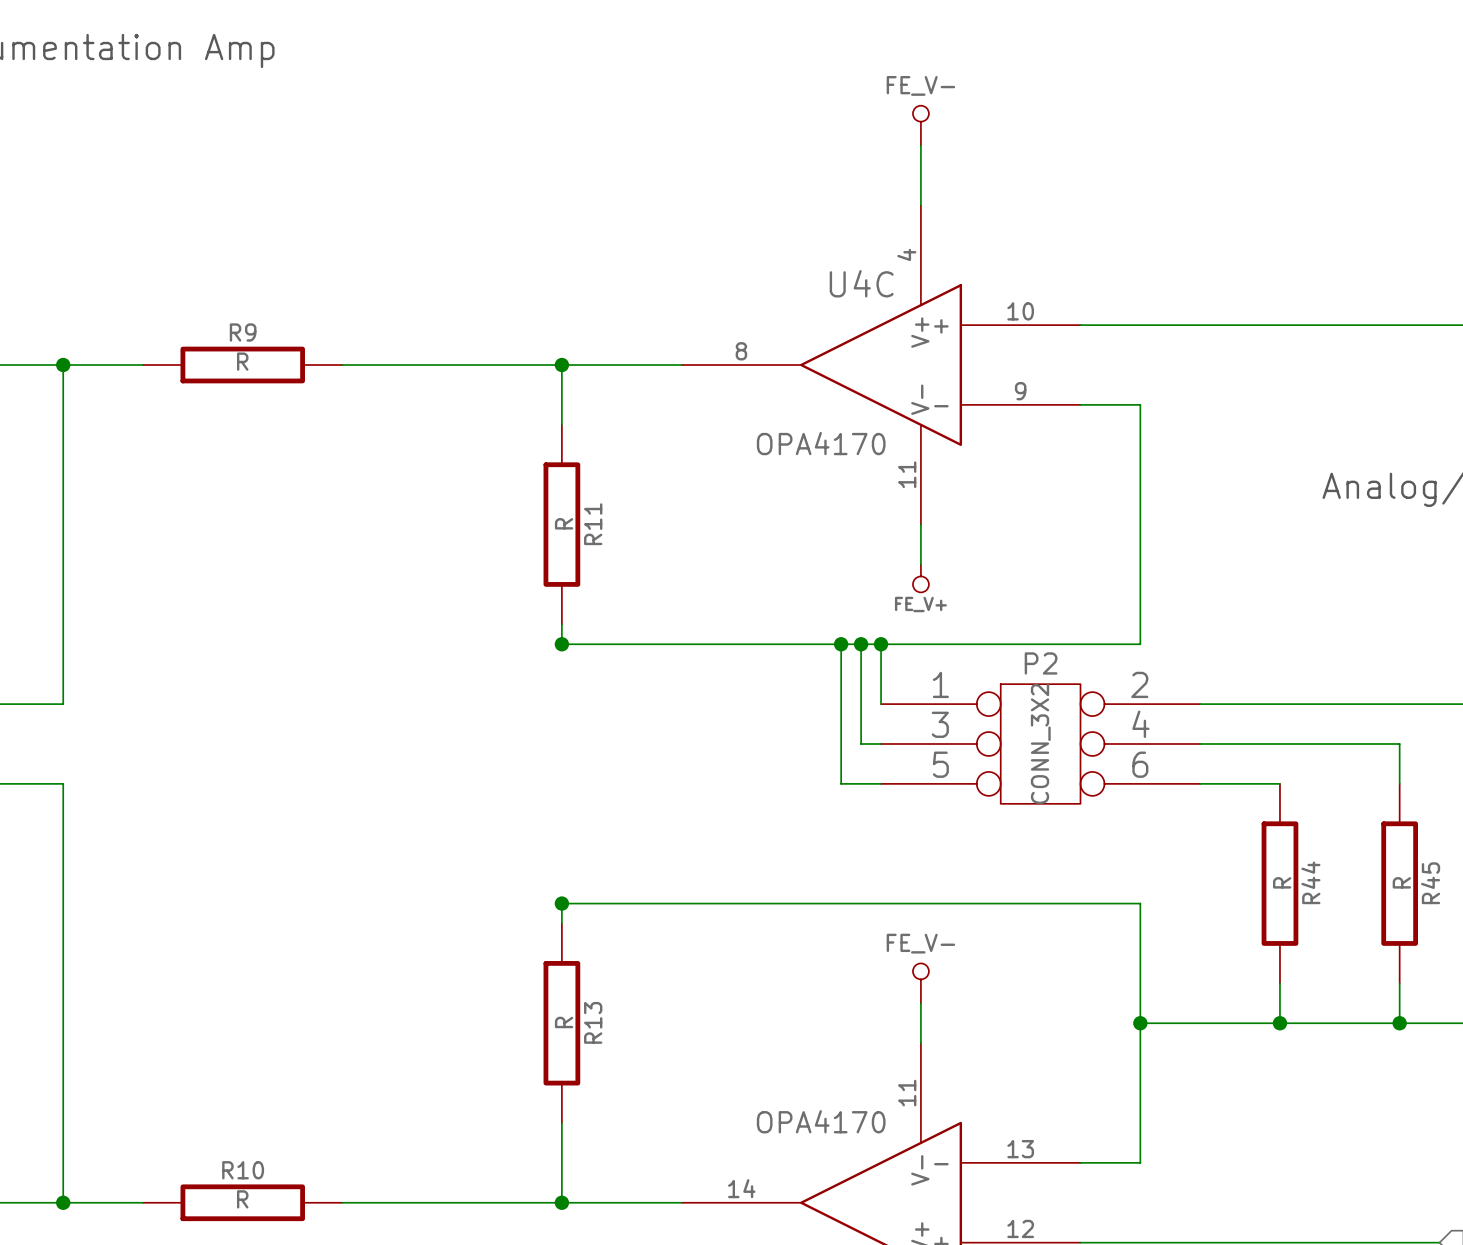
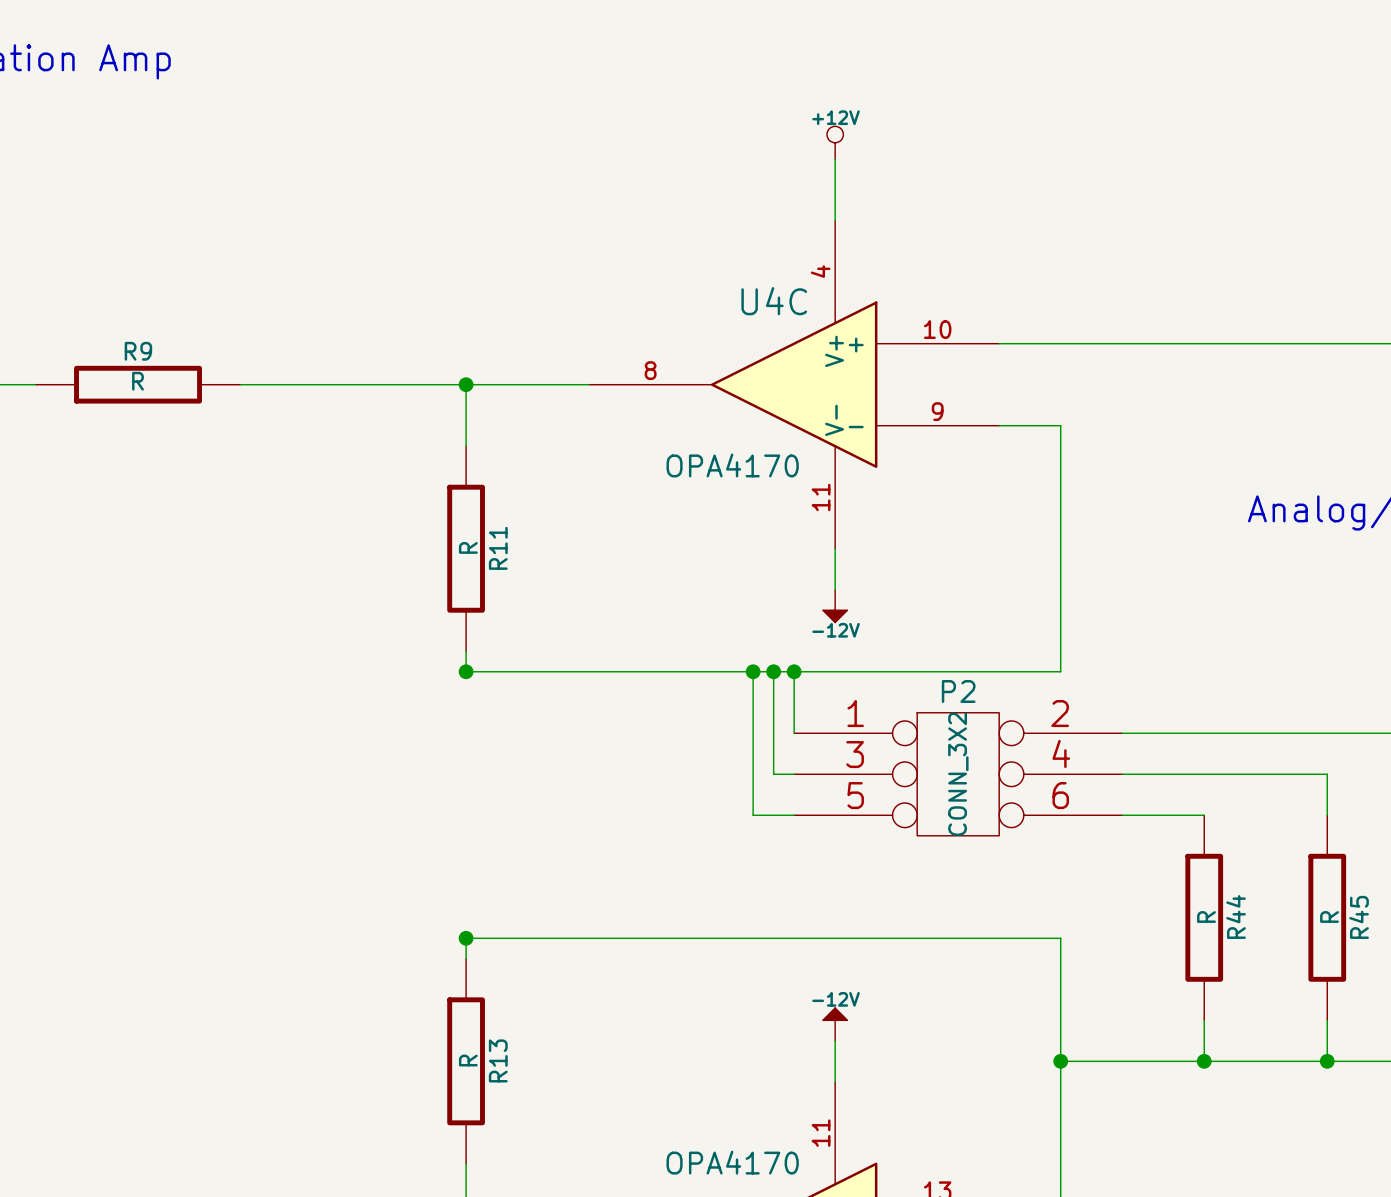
power symbol: FE_V- (920, 125) -> +12V (835, 142)
power symbol: FE_V+ (920, 578) -> -12V (835, 606)
power symbol: FE_V- (920, 983) -> -12V (835, 1024)

